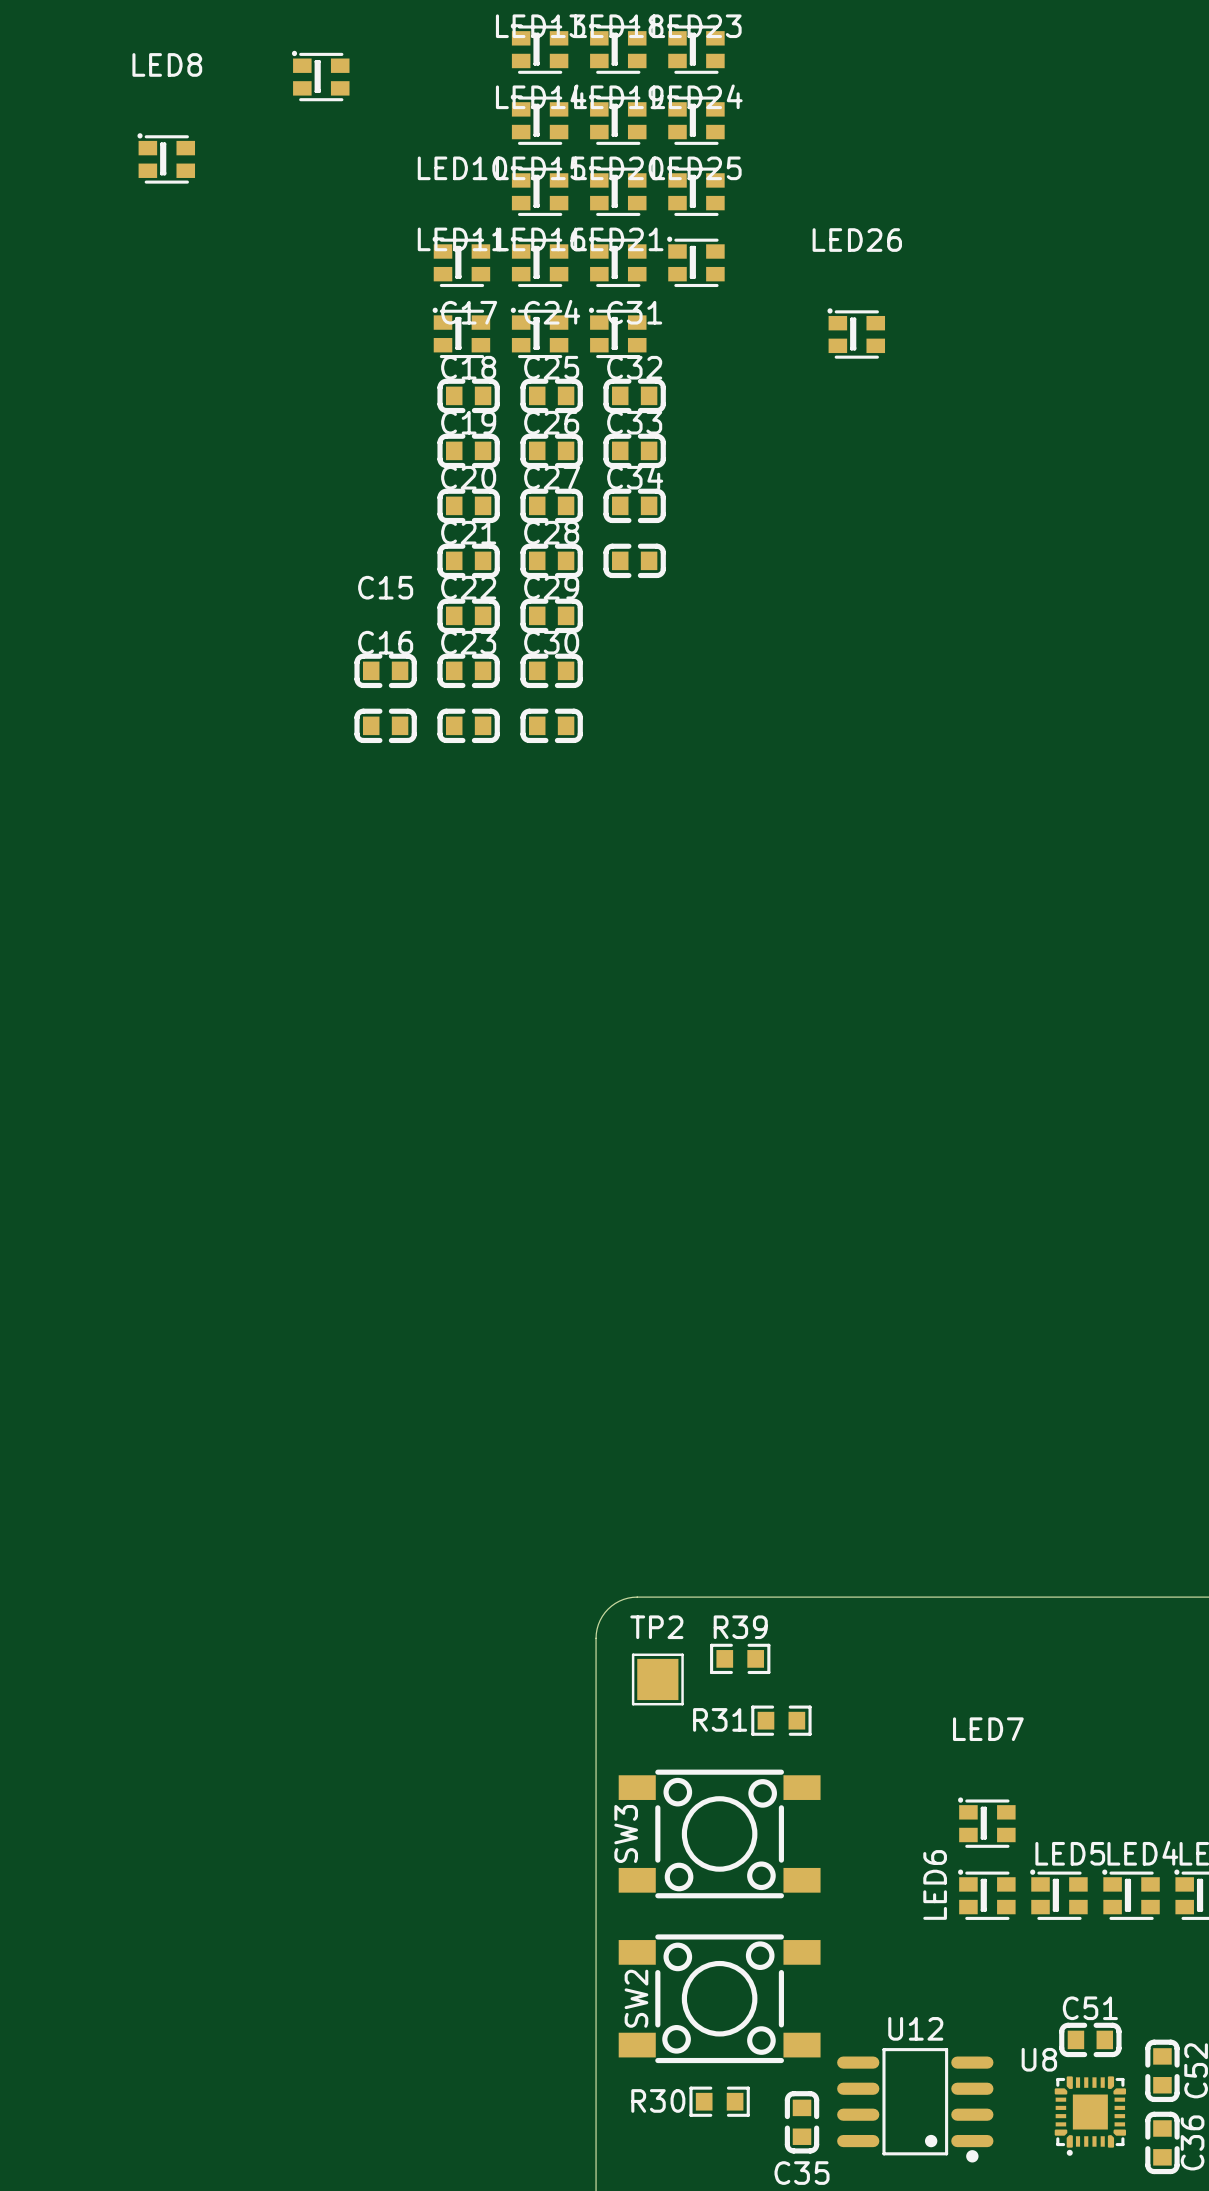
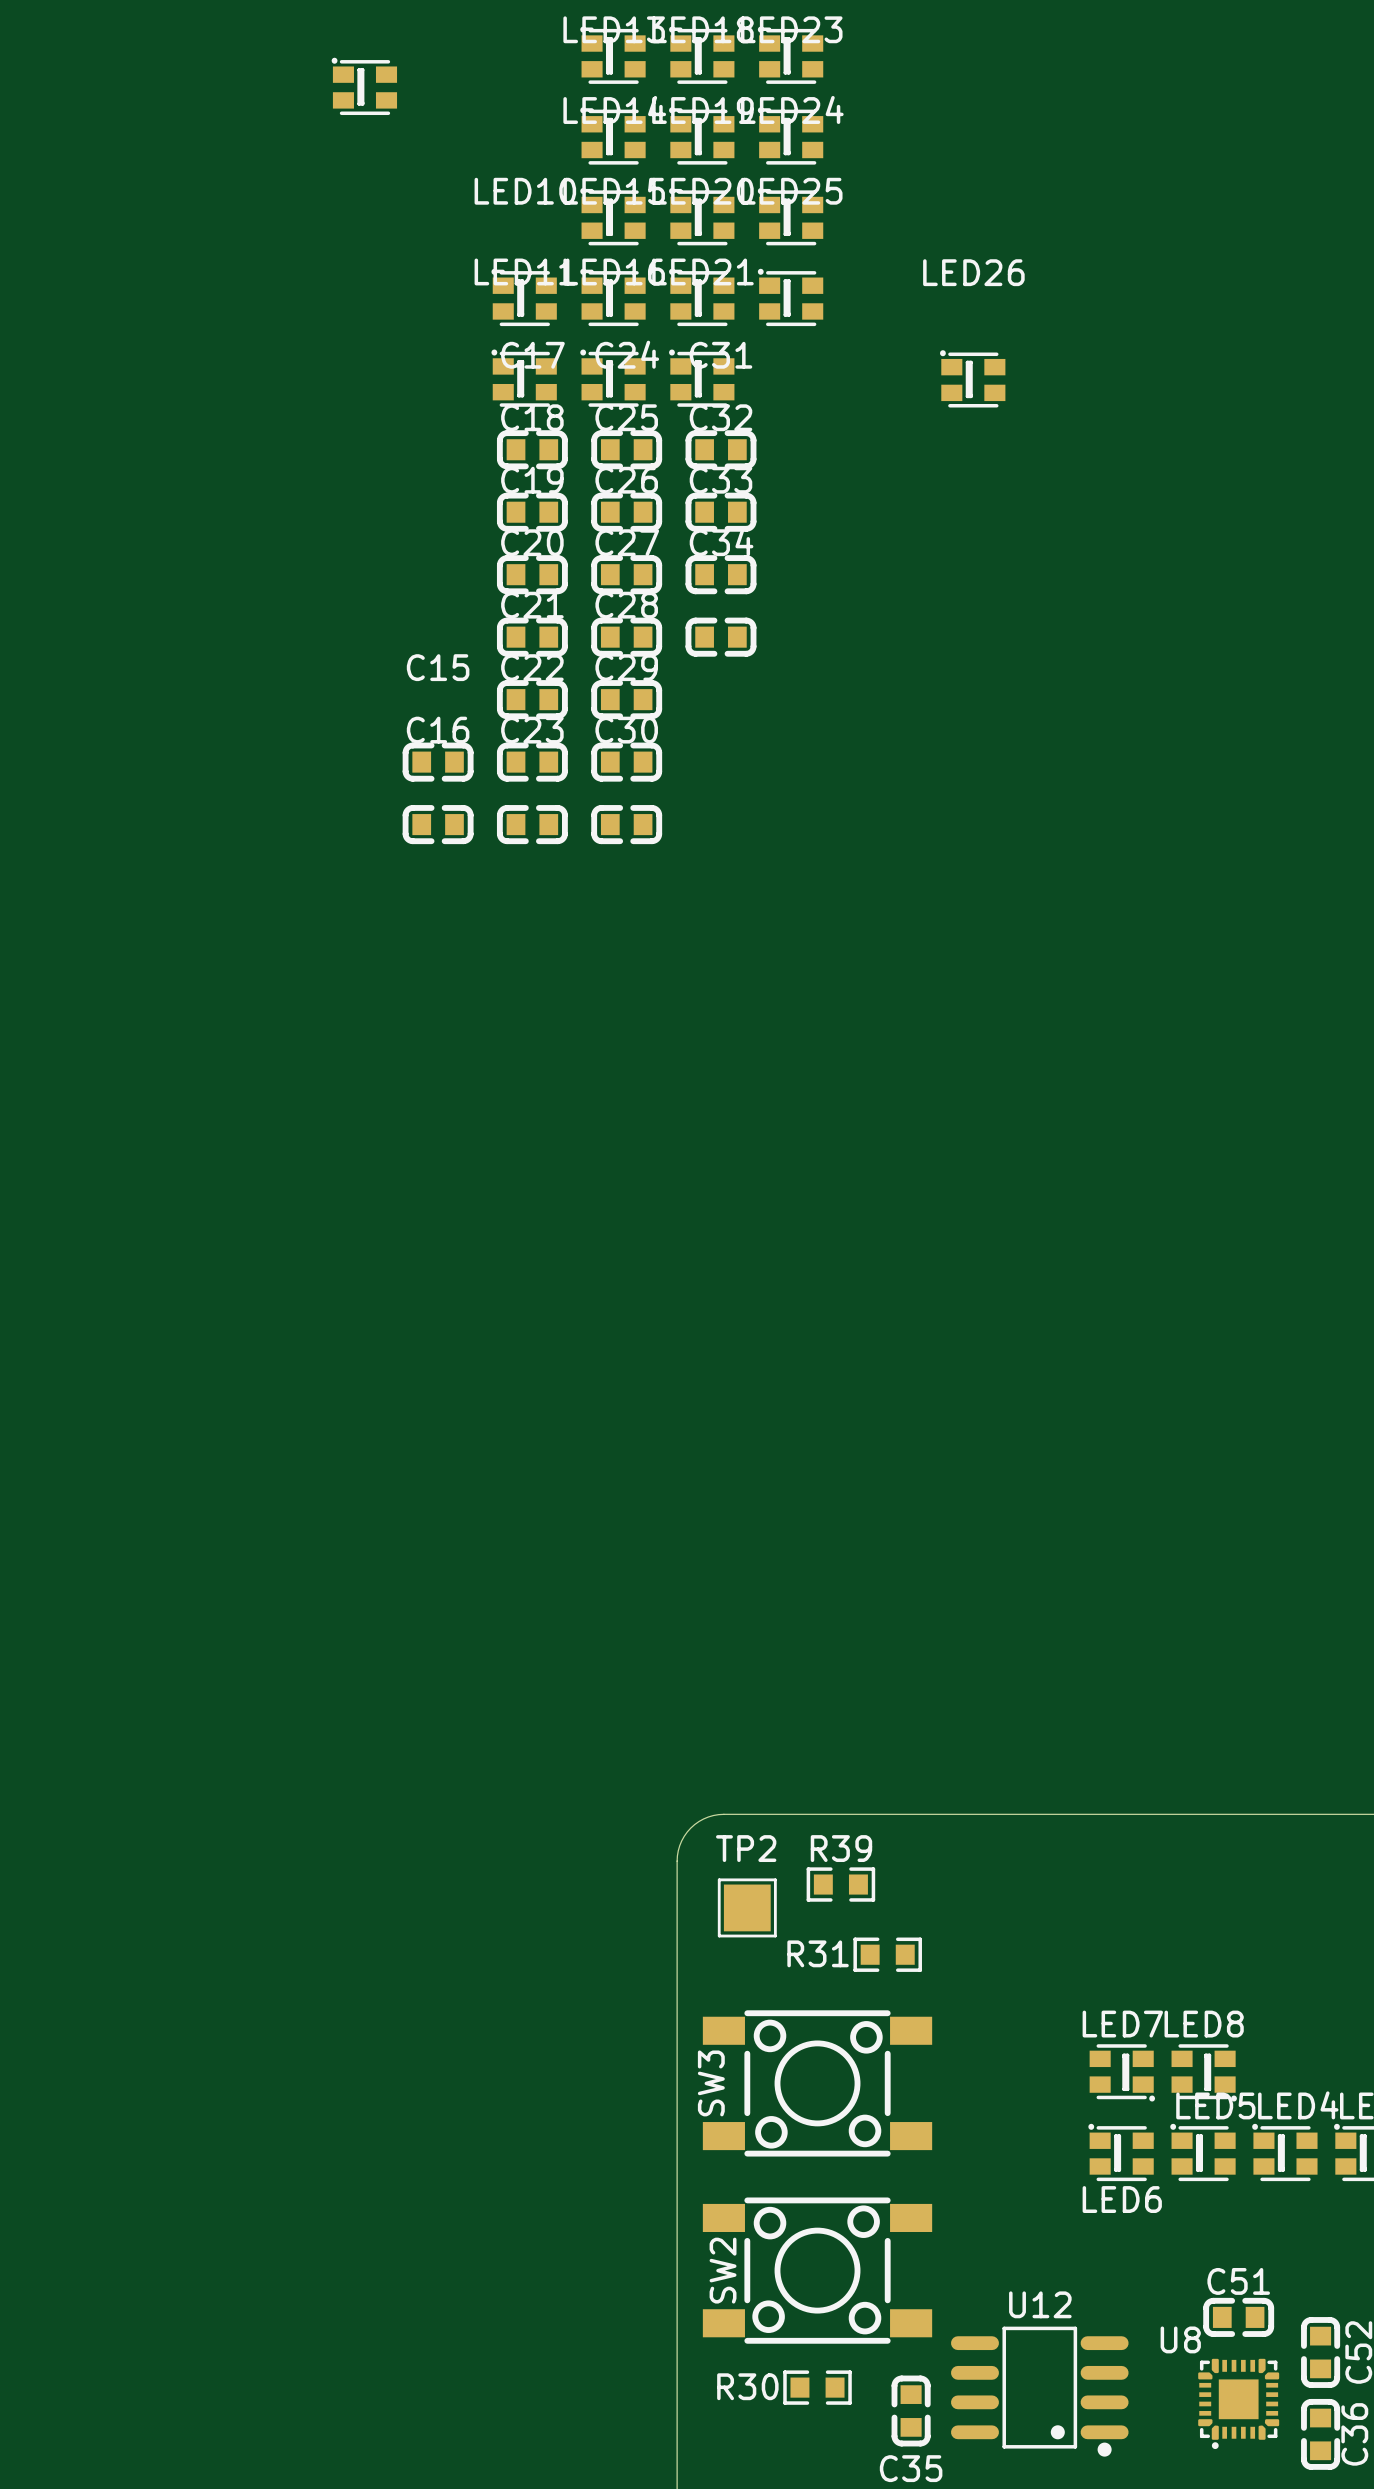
LED8 name position: LED8 (167, 64) -> LED8 (1204, 2024)
LED8 rotation: 0° (166, 158) -> 180° (1204, 2072)
LED8 position: (166, 158) -> (1204, 2072)
LED7 name position: LED7 (988, 1729) -> LED7 (1122, 2024)
LED7 rotation: 0° (986, 1822) -> 180° (1122, 2072)
LED6 name rotation: 0° (935, 1884) -> 90° clockwise (1122, 2199)

